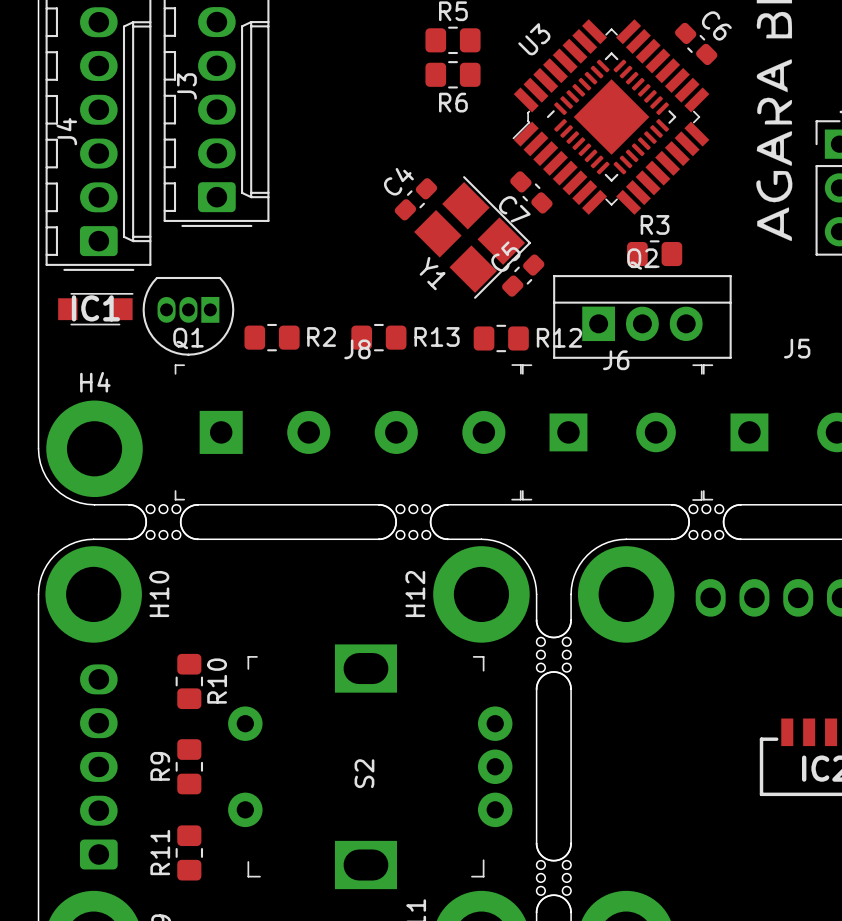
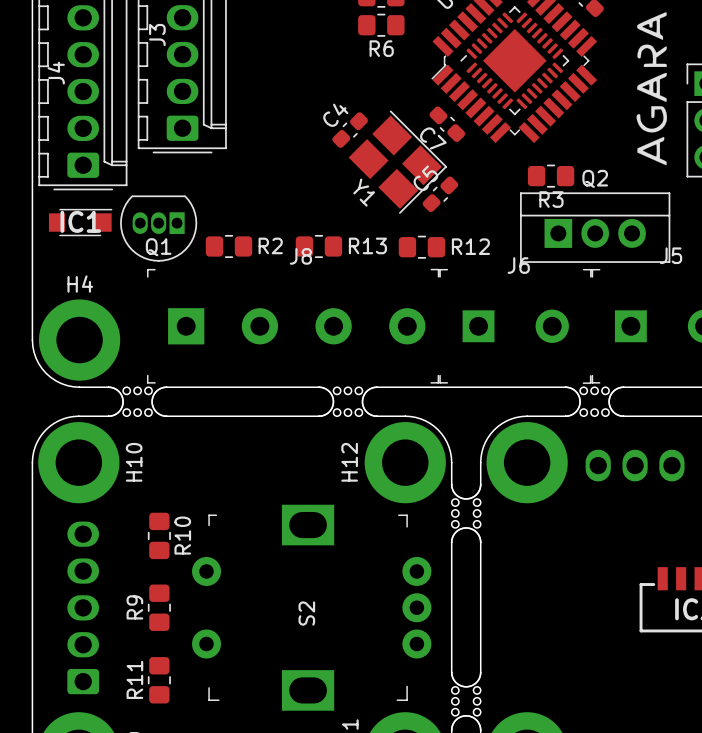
R3 name position: R3 (655, 224) -> R3 (551, 199)
Q2 position: (642, 316) -> (595, 227)

